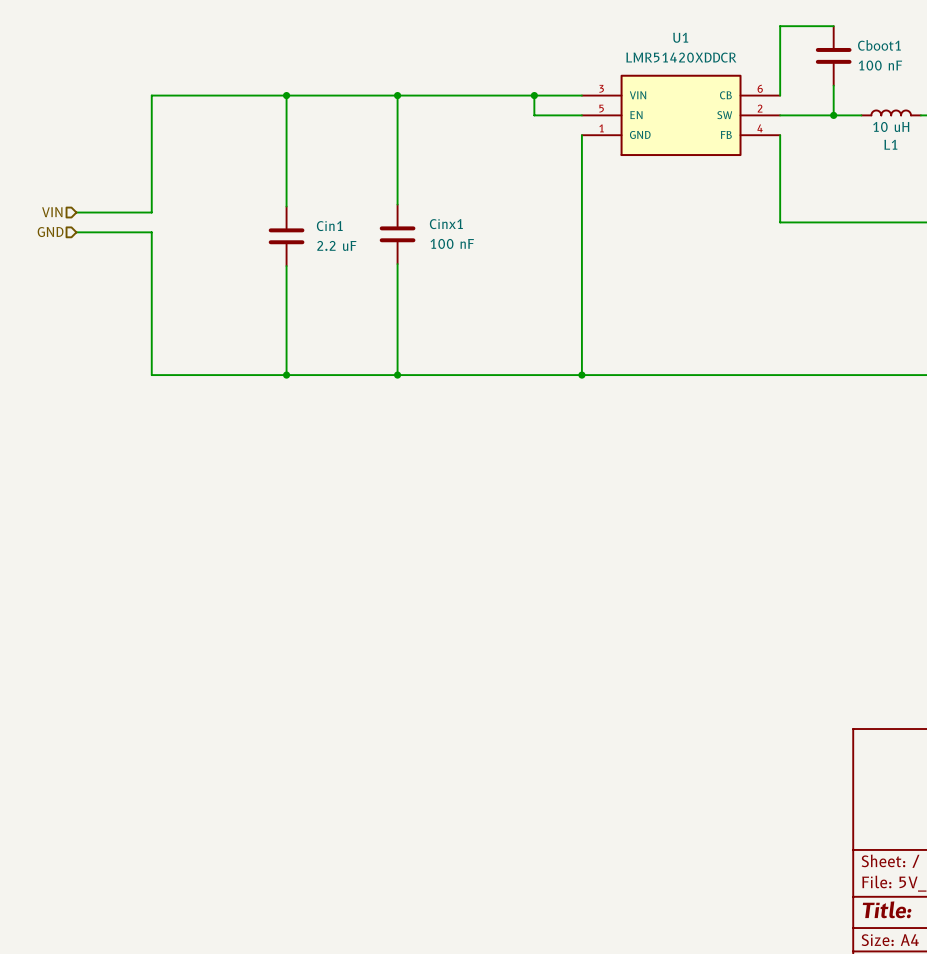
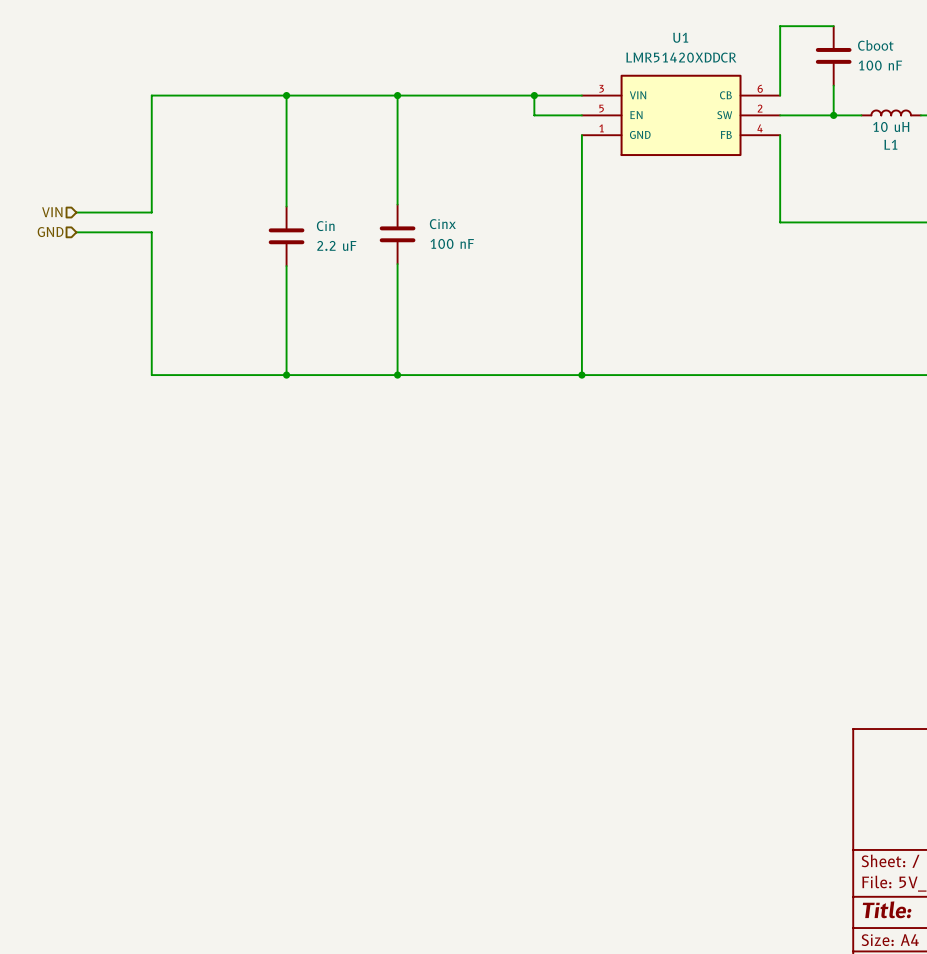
Cboot1 name: Cboot1 (879, 45) -> Cboot (875, 45)
Cinx1 name: Cinx1 (446, 224) -> Cinx (442, 224)
Cin1 name: Cin1 (329, 226) -> Cin (325, 226)

